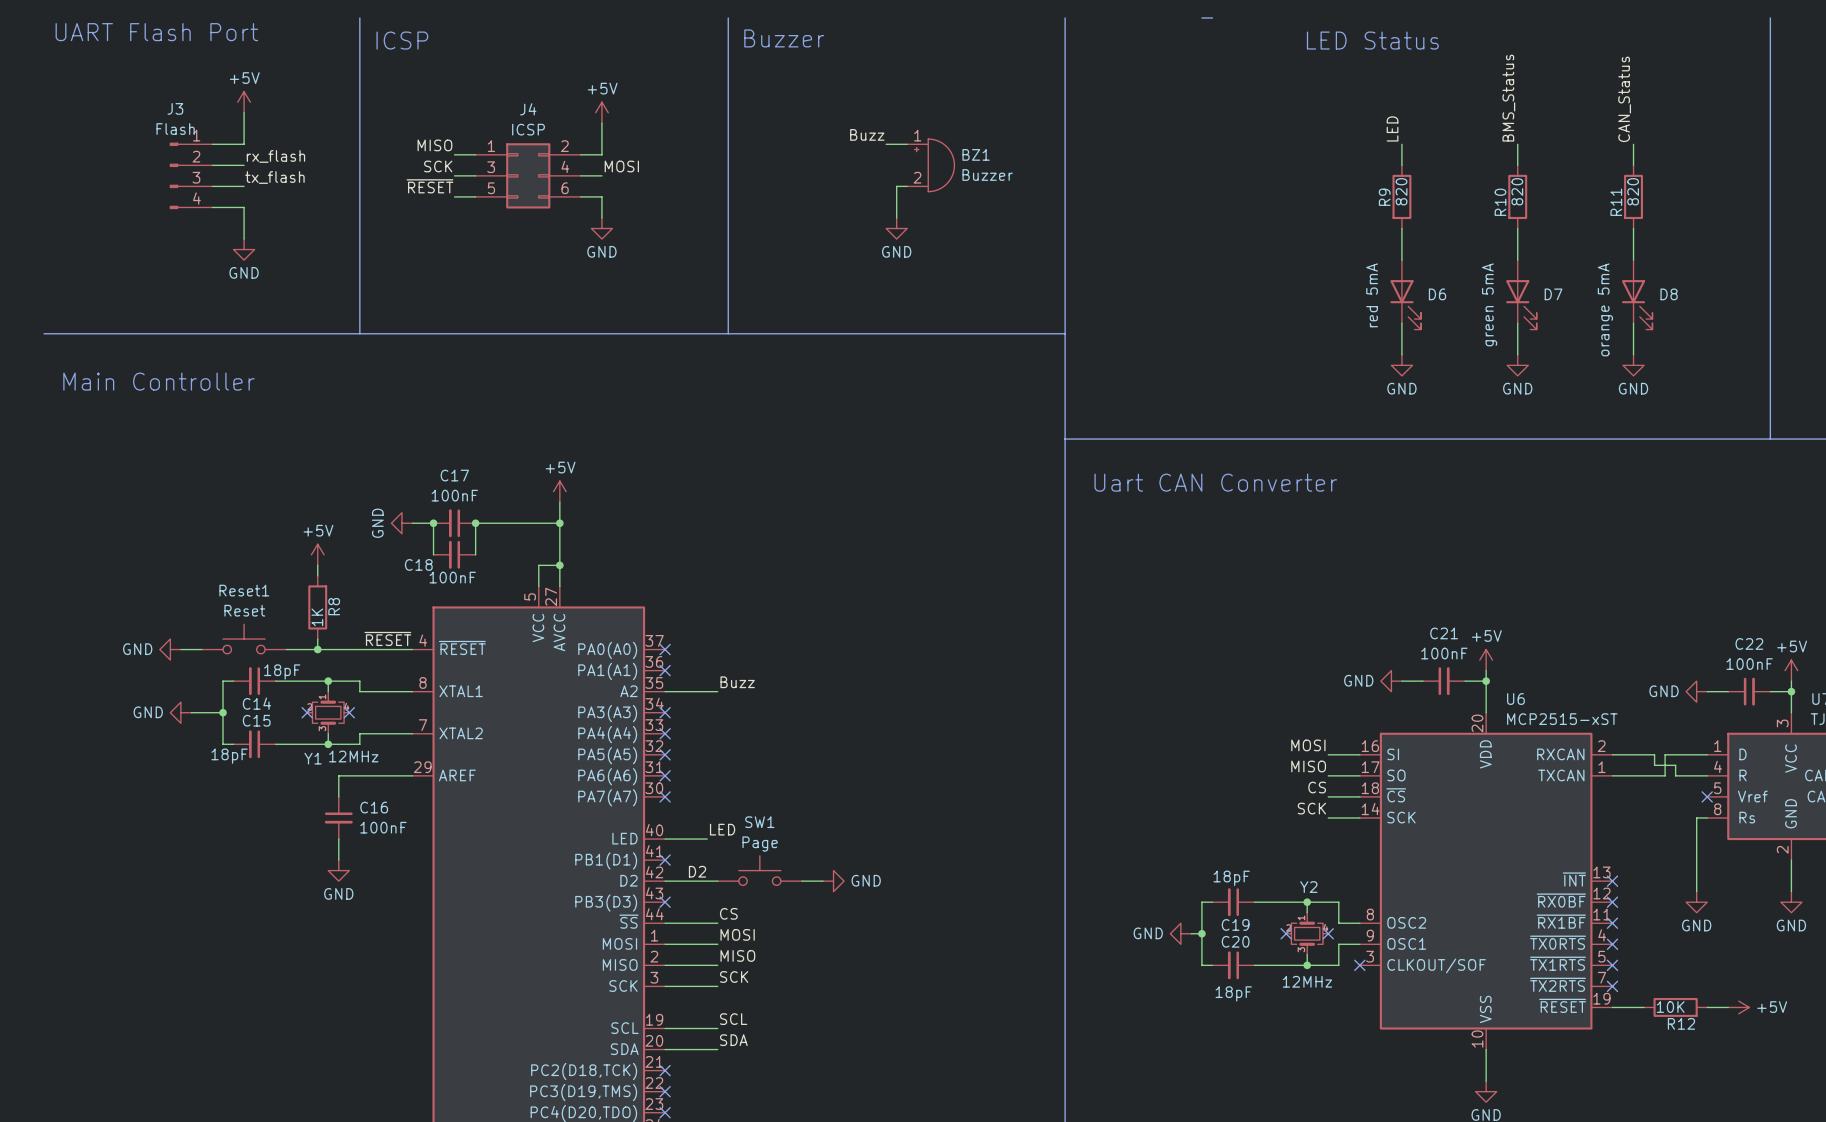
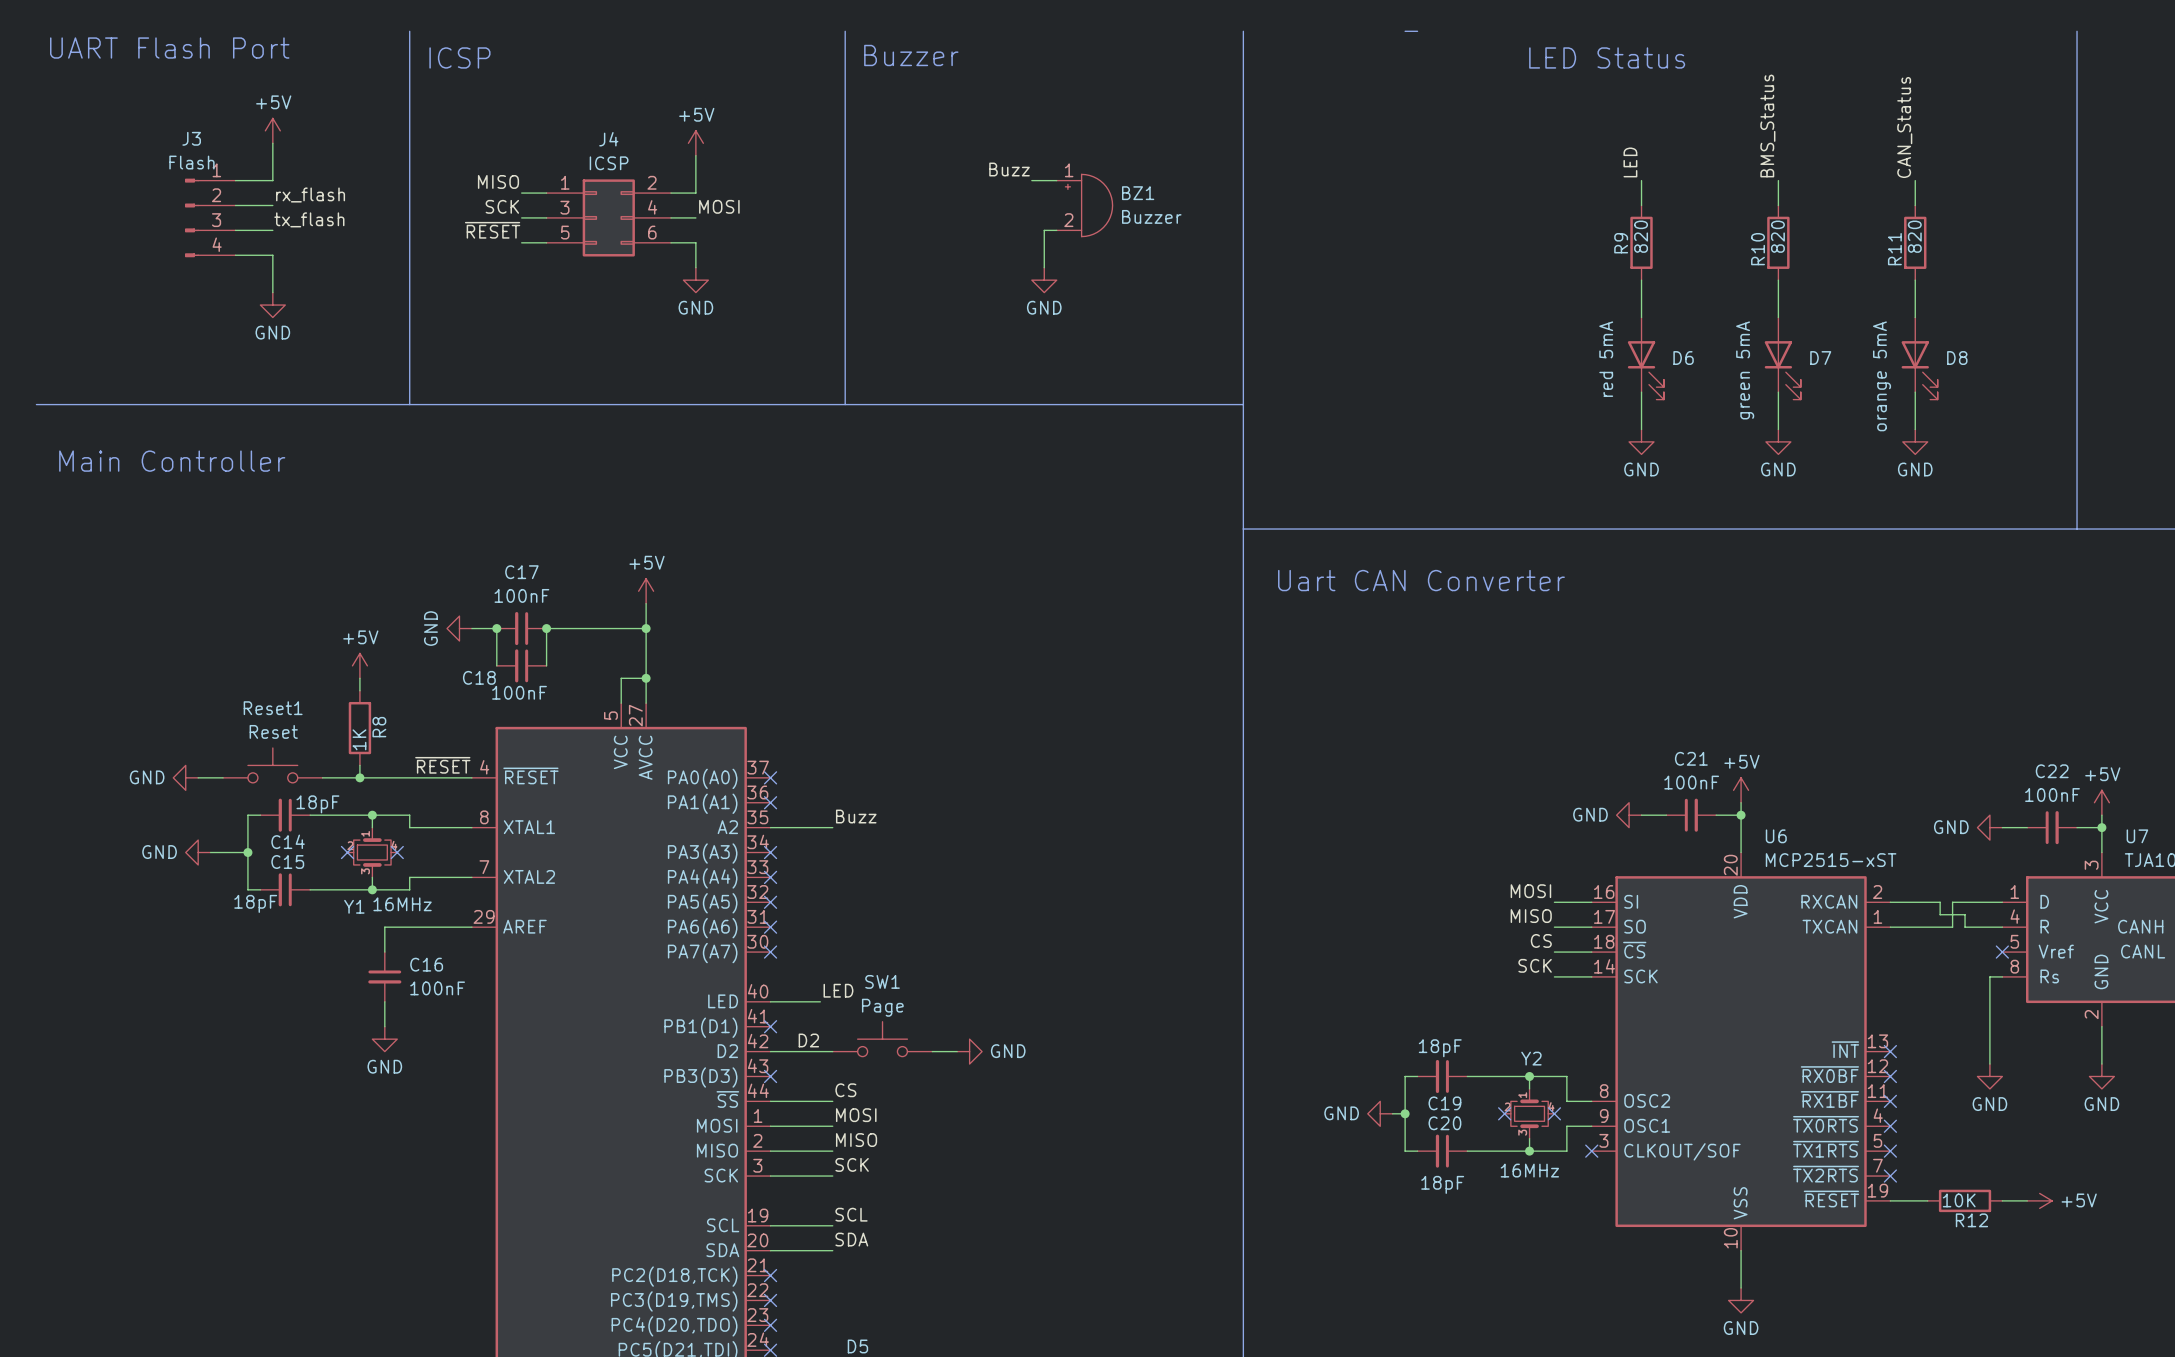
Y1 value: 12MHz (353, 756) -> 16MHz (402, 904)
Y2 value: 12MHz (1307, 981) -> 16MHz (1529, 1170)

